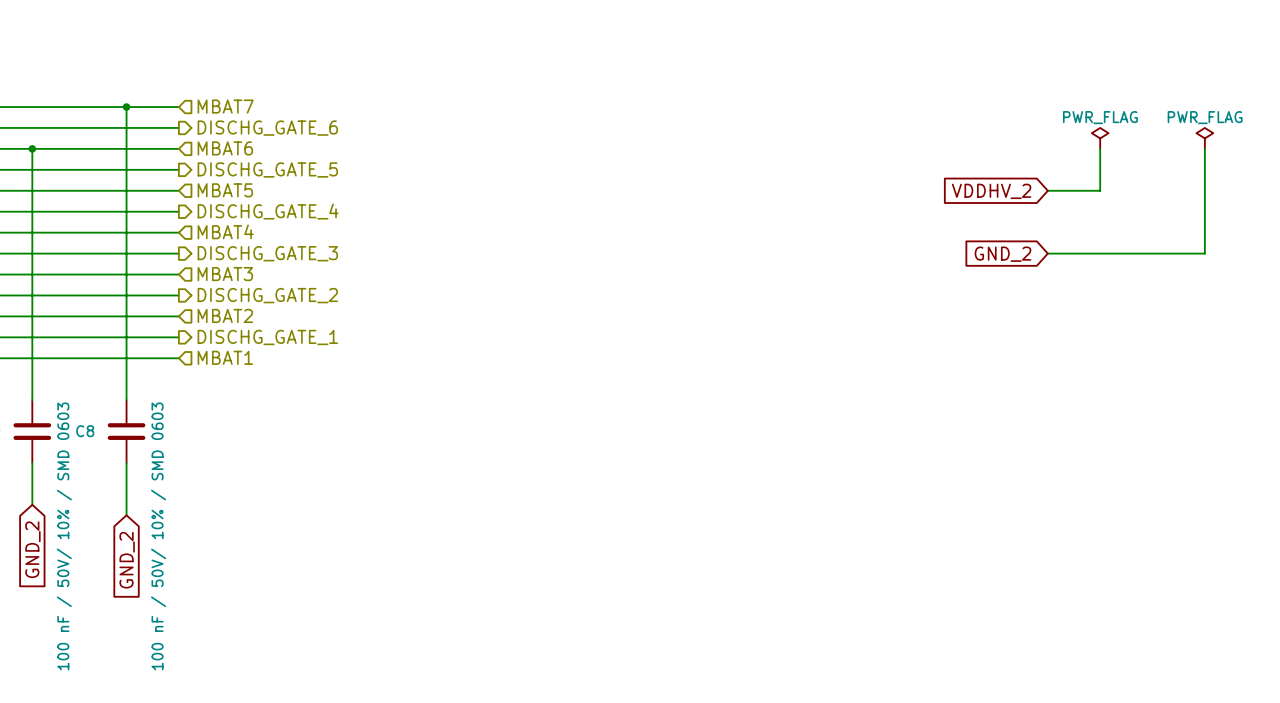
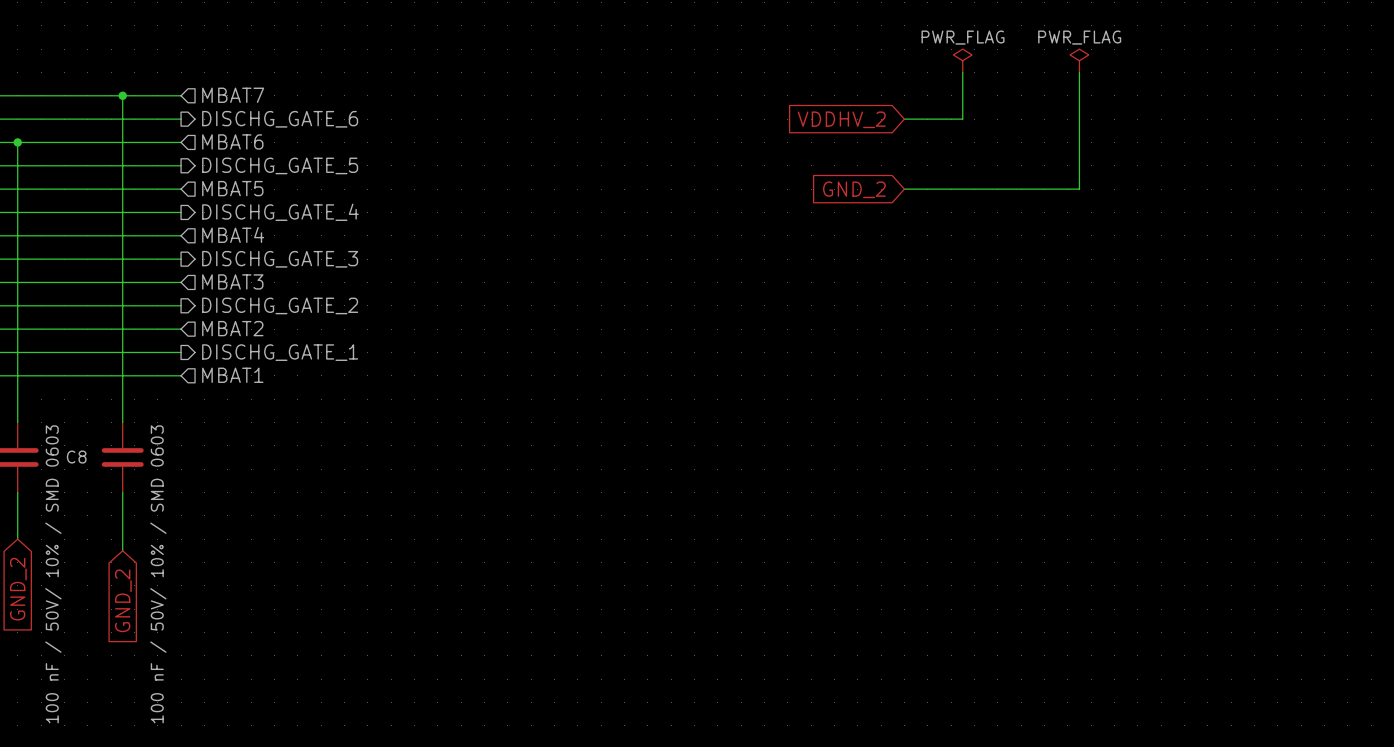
power symbol: none -> PWR_FLAG (962, 60)
power symbol: none -> PWR_FLAG (1079, 60)
wire: none -> (962, 72) (962, 119) (904, 119)
wire: none -> (1079, 72) (1079, 189) (904, 189)
global label: none -> VDDHV_2 (841, 119)
power symbol: PWR_FLAG (1100, 138) -> none
power symbol: PWR_FLAG (1204, 138) -> none
wire: (1100, 148) (1100, 190) (1047, 190) -> none
wire: (1204, 148) (1204, 253) (1047, 253) -> none
global label: none -> GND_2 (854, 189)
global label: VDDHV_2 (991, 191) -> none
global label: GND_2 (1002, 254) -> none

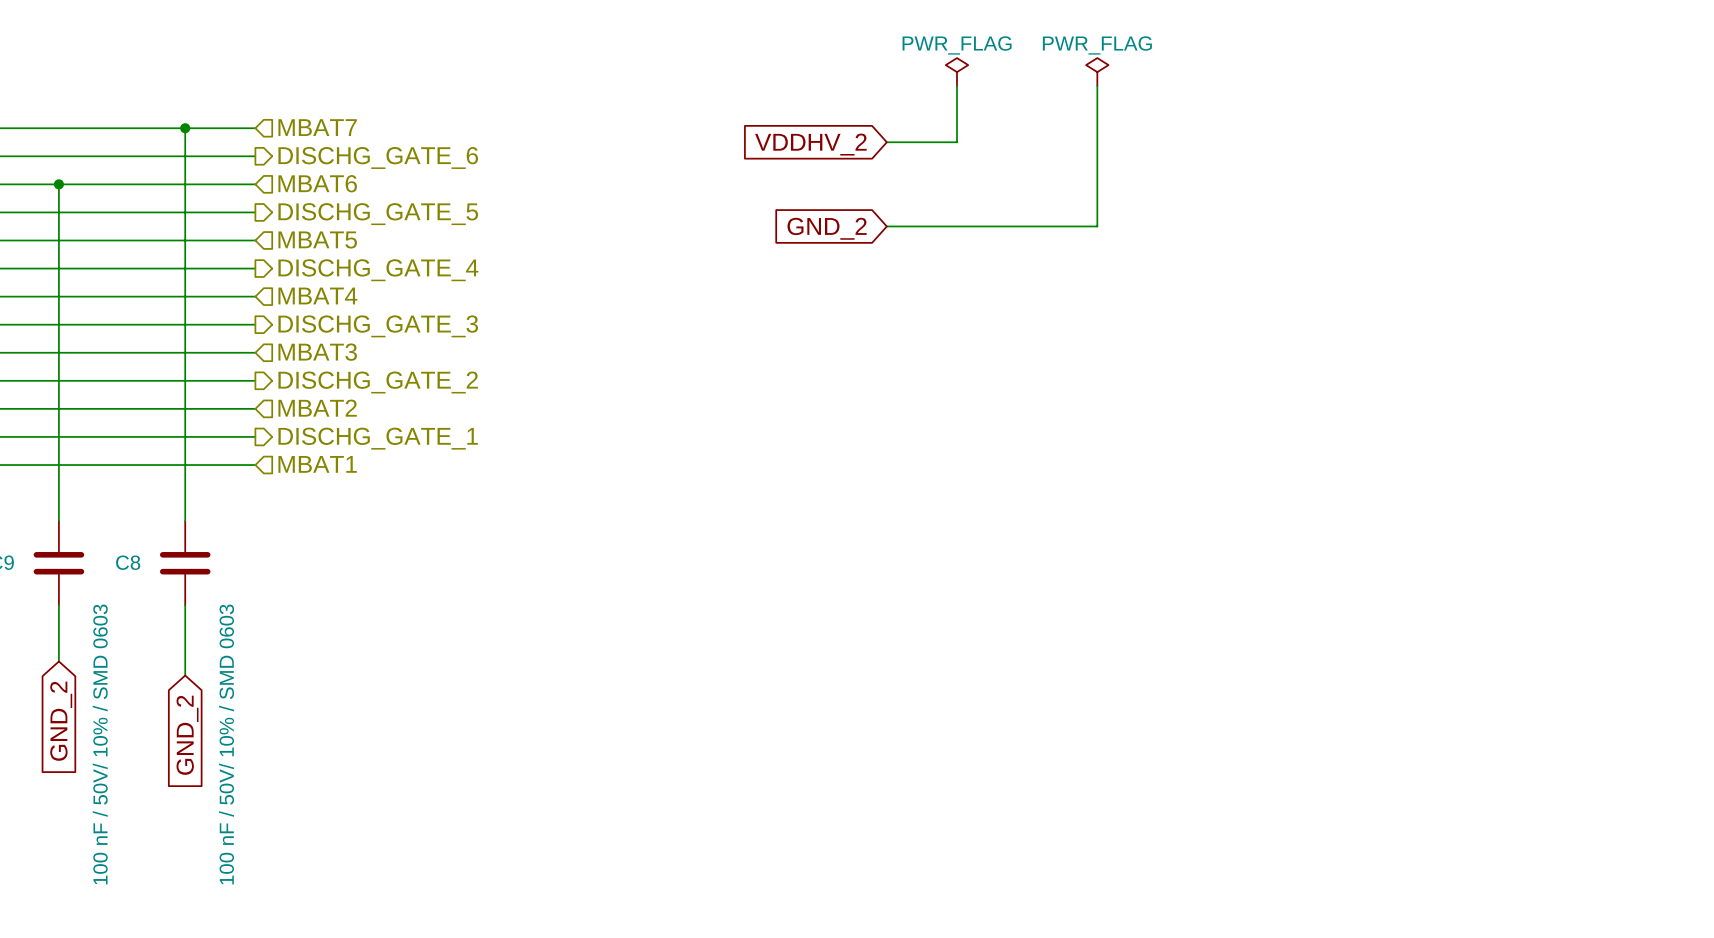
power symbol: none -> PWR_FLAG (957, 72)
power symbol position: PWR_FLAG (962, 60) -> PWR_FLAG (1097, 72)
power symbol: PWR_FLAG (1079, 60) -> none
wire: (962, 72) (962, 119) (904, 119) -> (957, 86) (957, 142) (886, 142)
wire: (1079, 72) (1079, 189) (904, 189) -> (1097, 86) (1097, 226) (886, 226)
global label position: VDDHV_2 (841, 119) -> VDDHV_2 (810, 144)
global label position: GND_2 (854, 189) -> GND_2 (827, 228)

